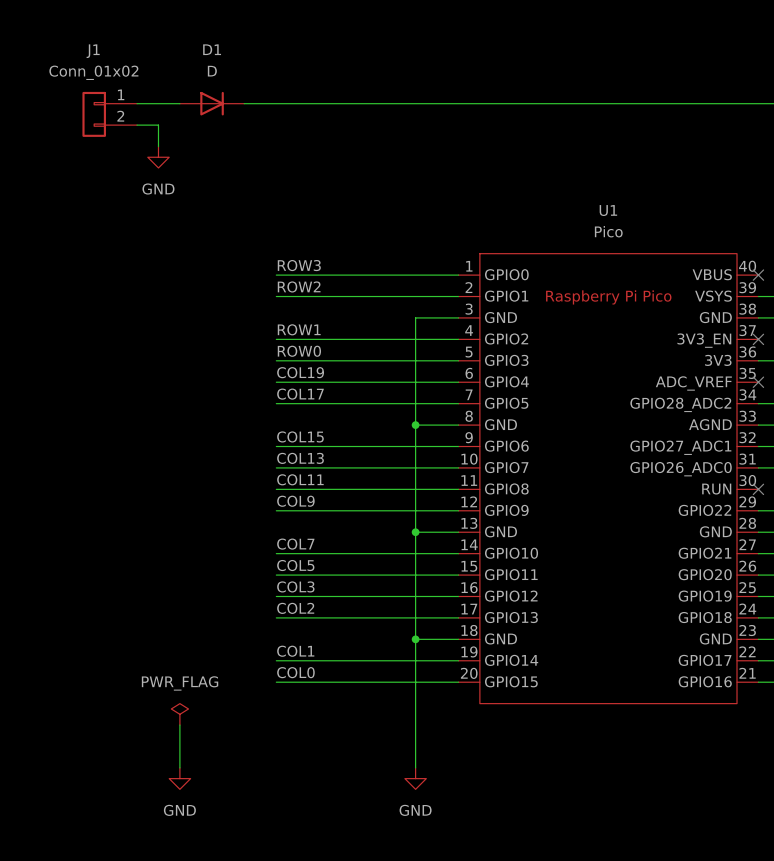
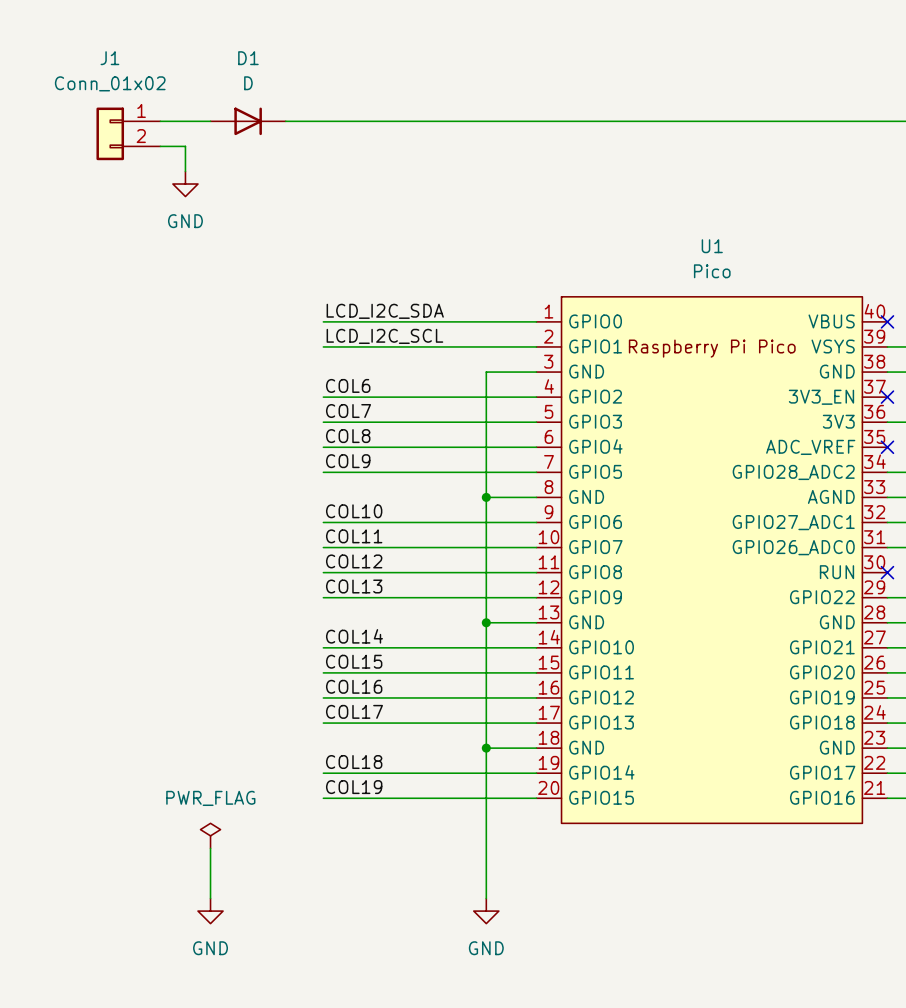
label: ROW3 (299, 265) -> LCD_I2C_SDA (385, 311)
label: ROW2 (299, 286) -> LCD_I2C_SCL (384, 336)
label: ROW1 (299, 329) -> COL6 (348, 385)
label: ROW0 (299, 351) -> COL7 (348, 411)
label: COL19 (300, 372) -> COL8 (348, 436)
label: COL17 (300, 394) -> COL9 (348, 461)
label: COL15 (300, 436) -> COL10 (354, 511)
label: COL13 (300, 458) -> COL11 (354, 536)
label: COL11 (300, 479) -> COL12 (354, 561)
label: COL9 (295, 501) -> COL13 (354, 586)
label: COL7 (295, 544) -> COL14 (354, 636)
label: COL5 (295, 565) -> COL15 (354, 661)
label: COL3 (295, 586) -> COL16 (354, 686)
label: COL2 (295, 608) -> COL17 (354, 711)
label: COL1 (295, 651) -> COL18 (354, 762)
label: COL0 (295, 672) -> COL19 (354, 787)

